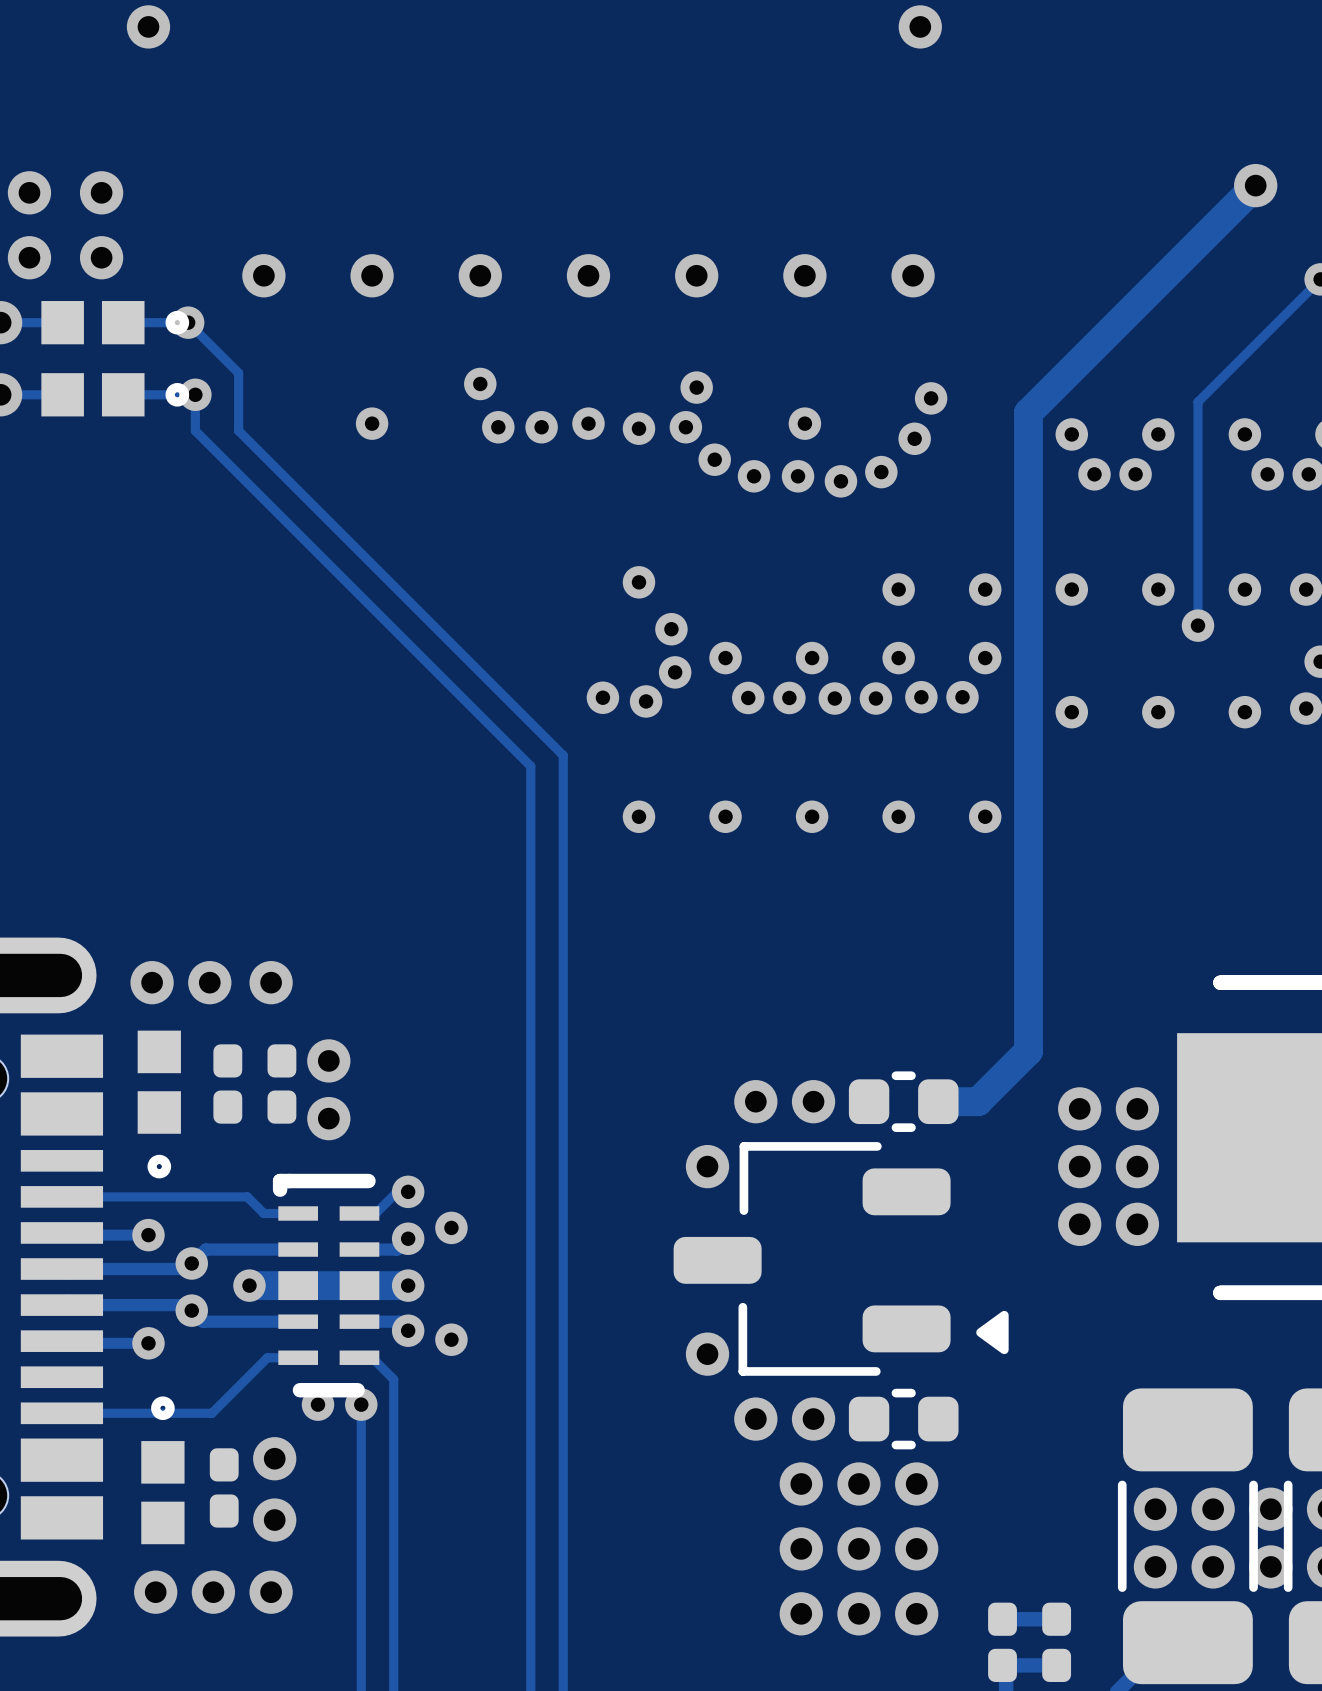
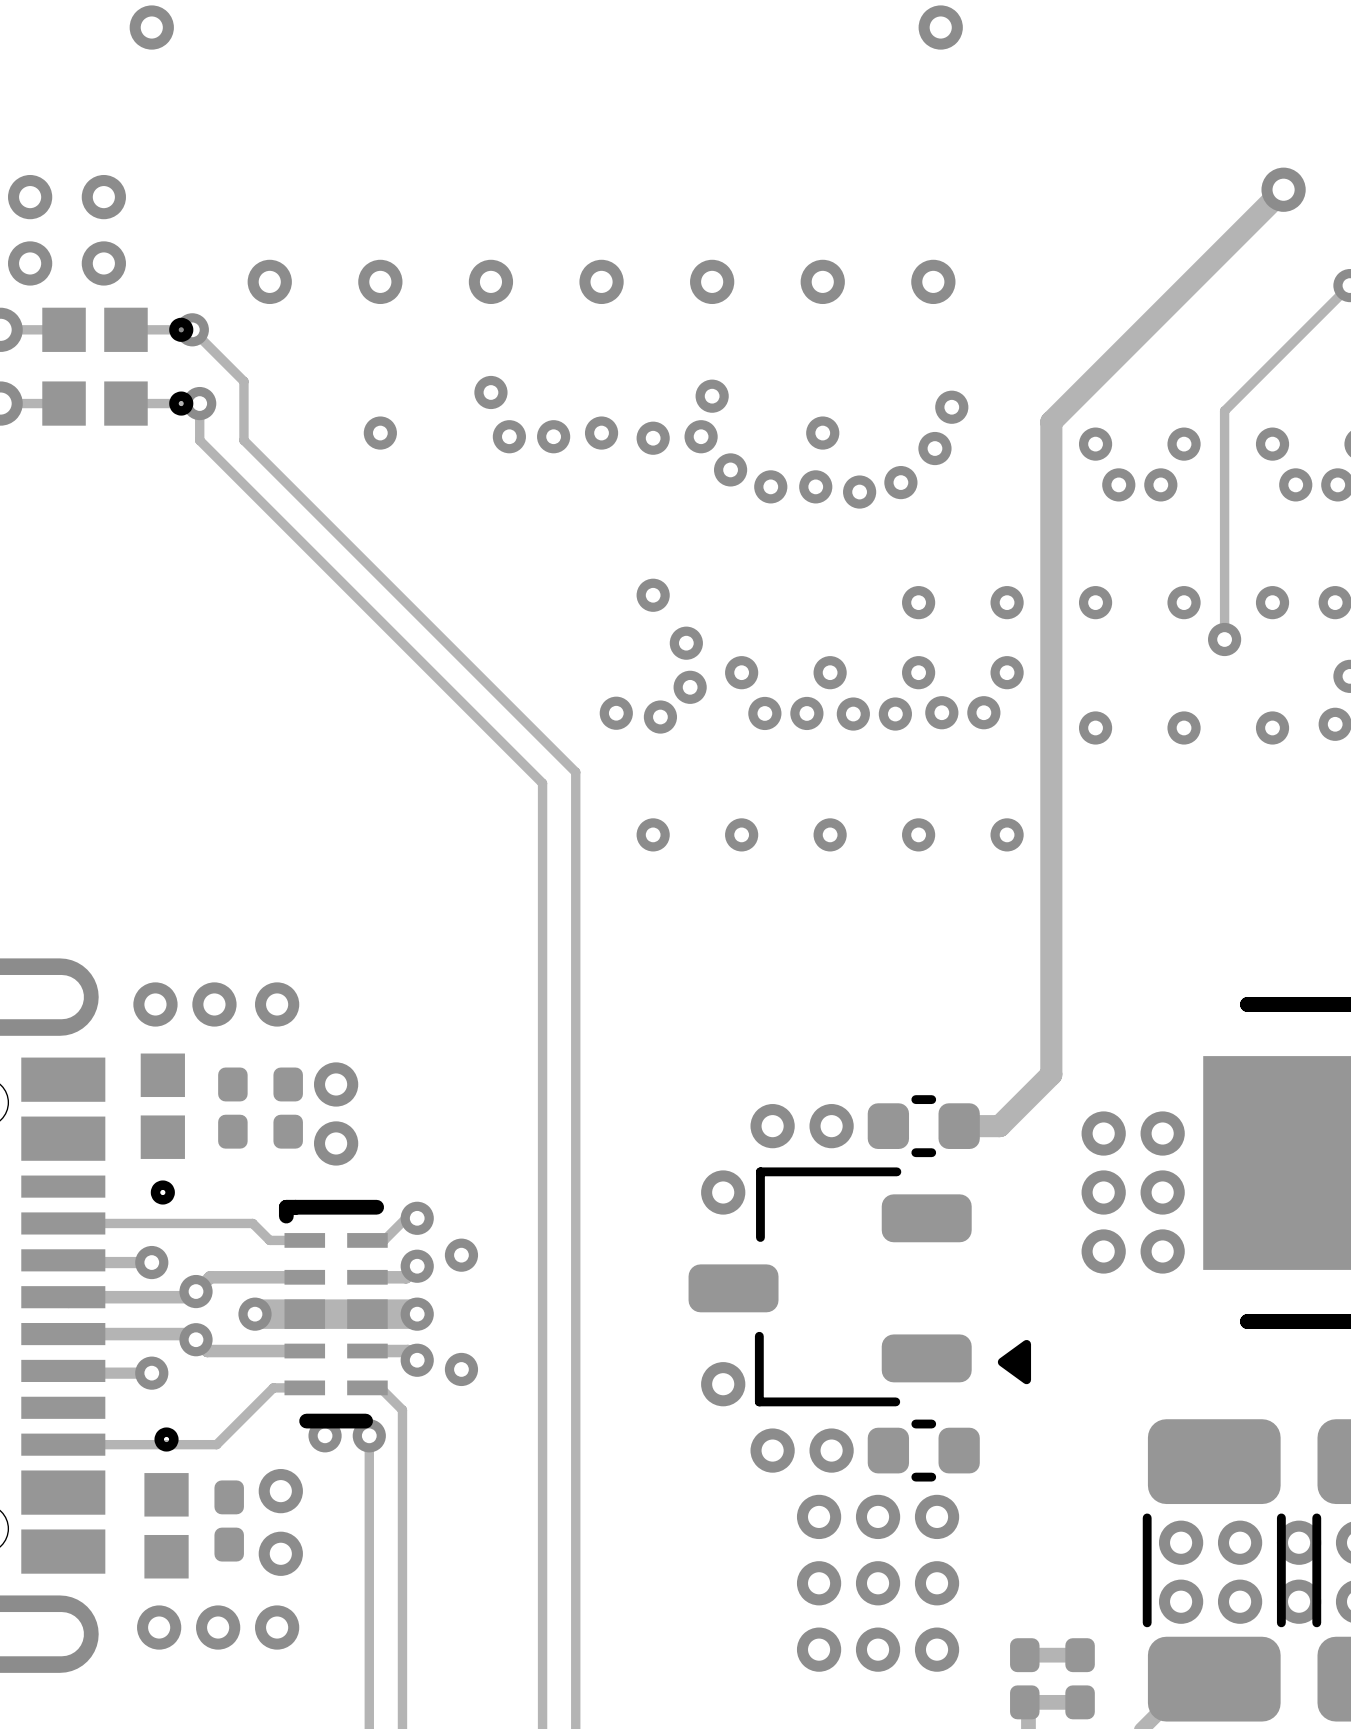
track width: thick (1255, 185) (1028, 412) (1028, 1051) (978, 1101) (938, 1101) -> thin (1283, 189) (1051, 421) (1051, 1074) (999, 1126) (959, 1126)

